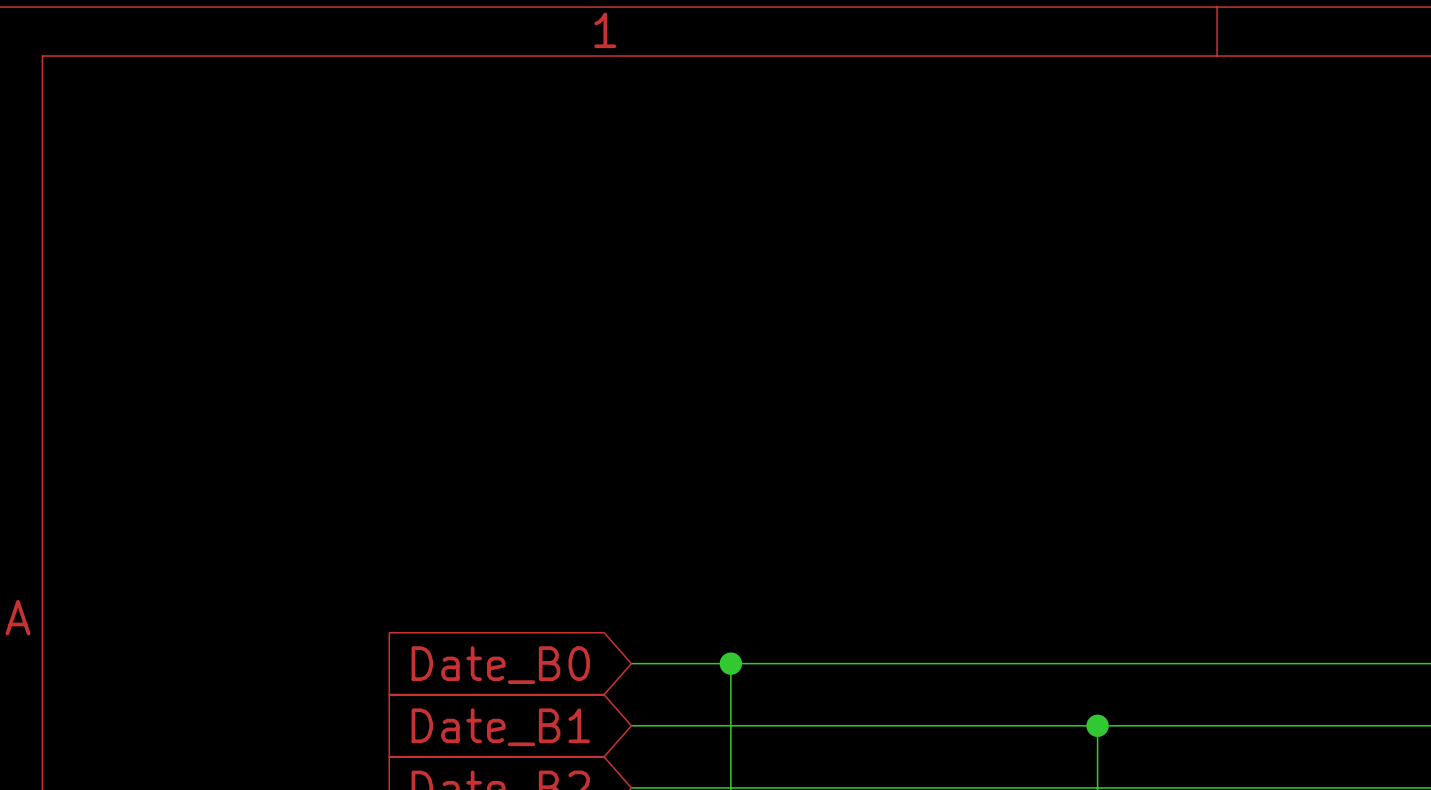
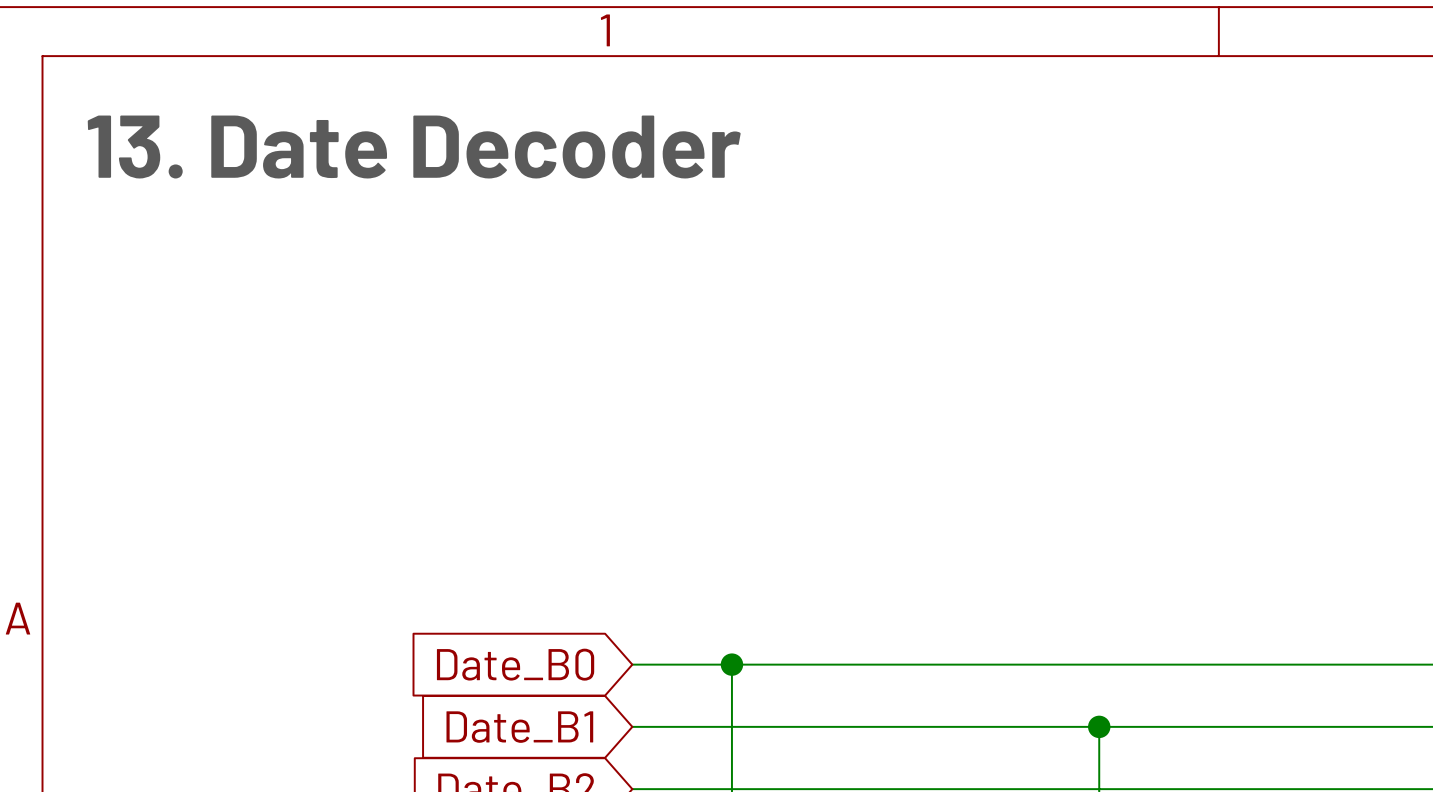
text: none -> 13. Date Decoder (414, 147)

